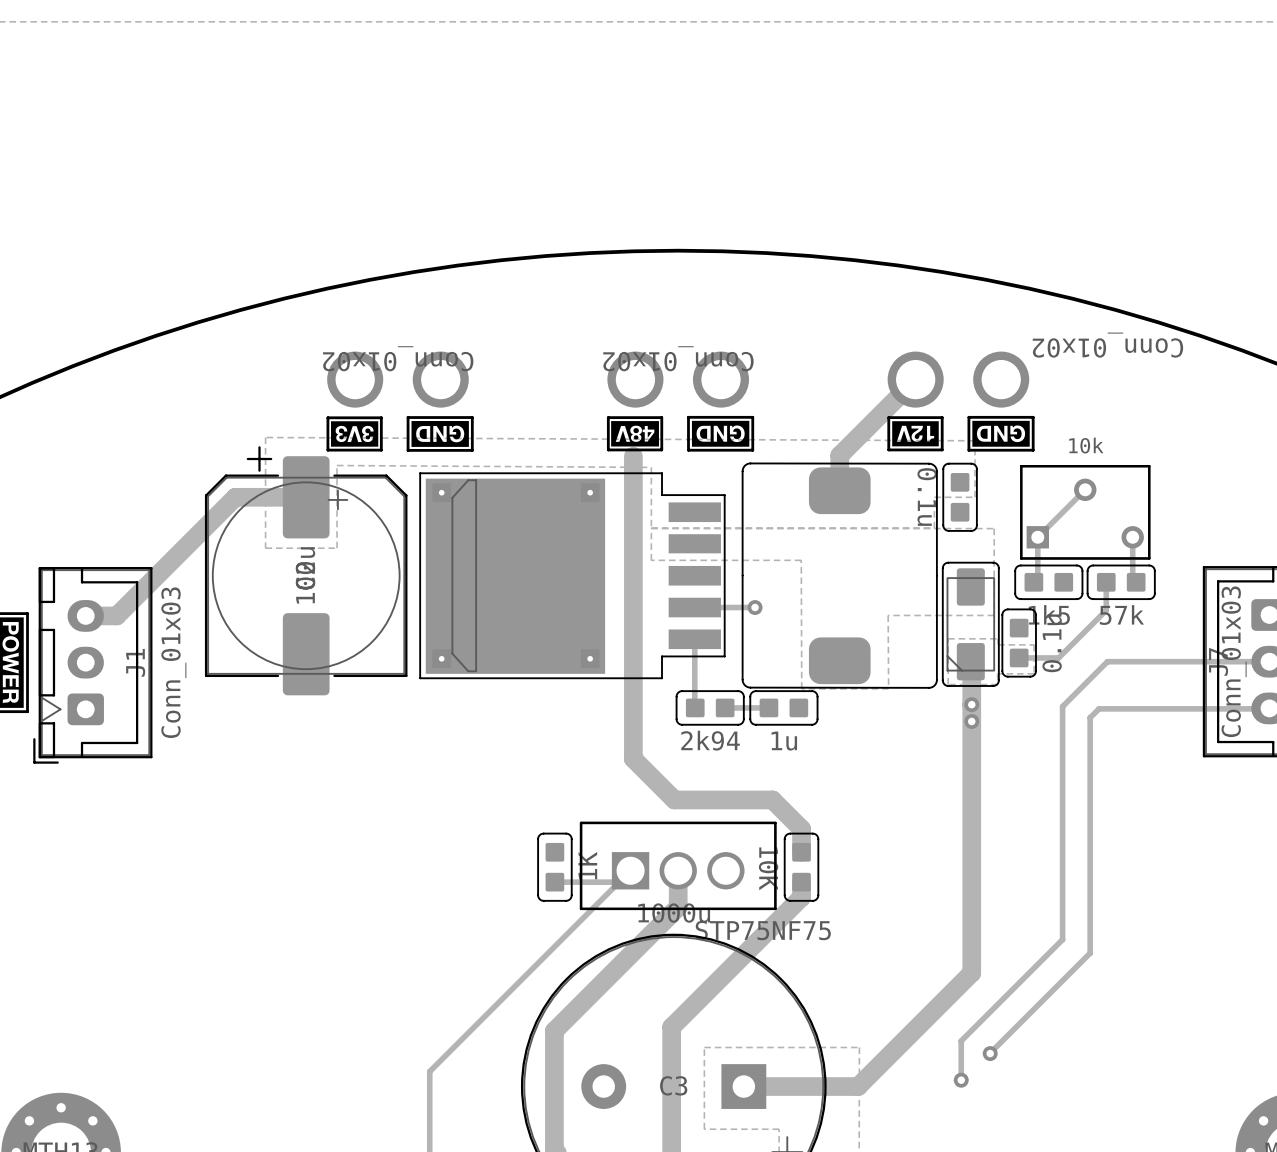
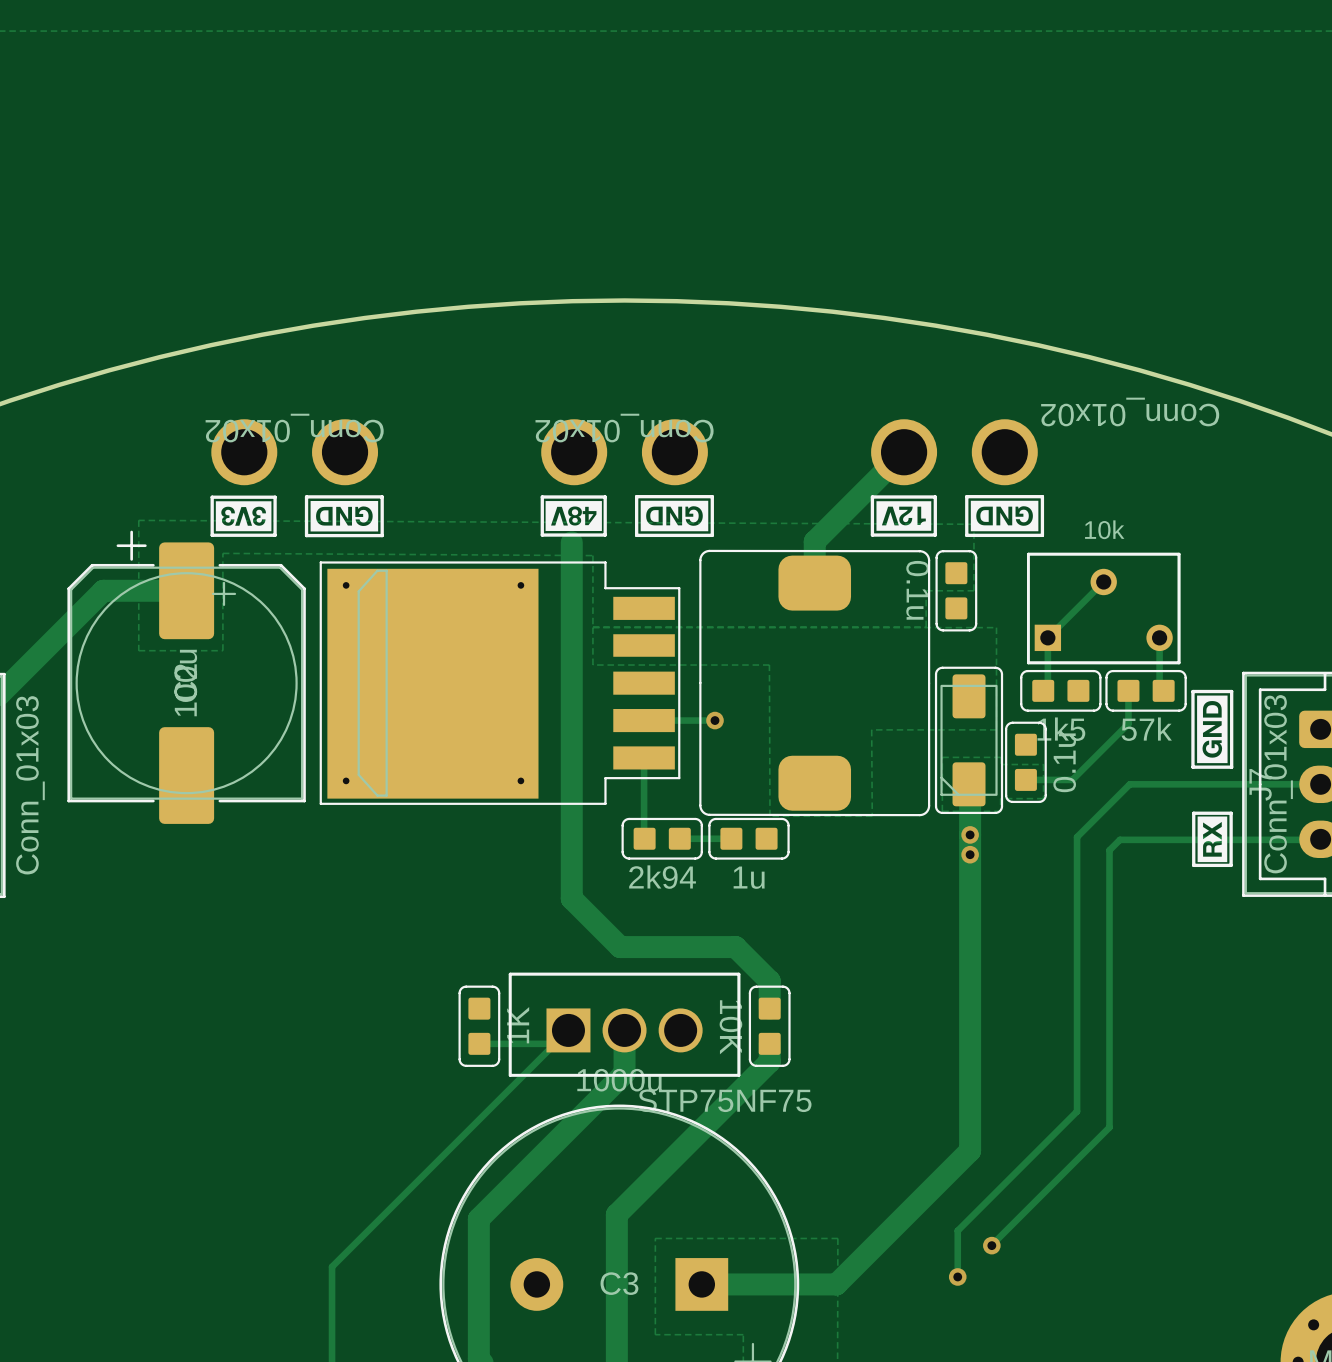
line: none -> (1192, 691) (1192, 767) (1231, 767) (1231, 691) (1192, 691)
drawing: none -> [1197, 695, 1228, 764]
line: none -> (1193, 813) (1231, 813) (1231, 865) (1193, 865) (1193, 813)
drawing: none -> [1197, 816, 1228, 863]

